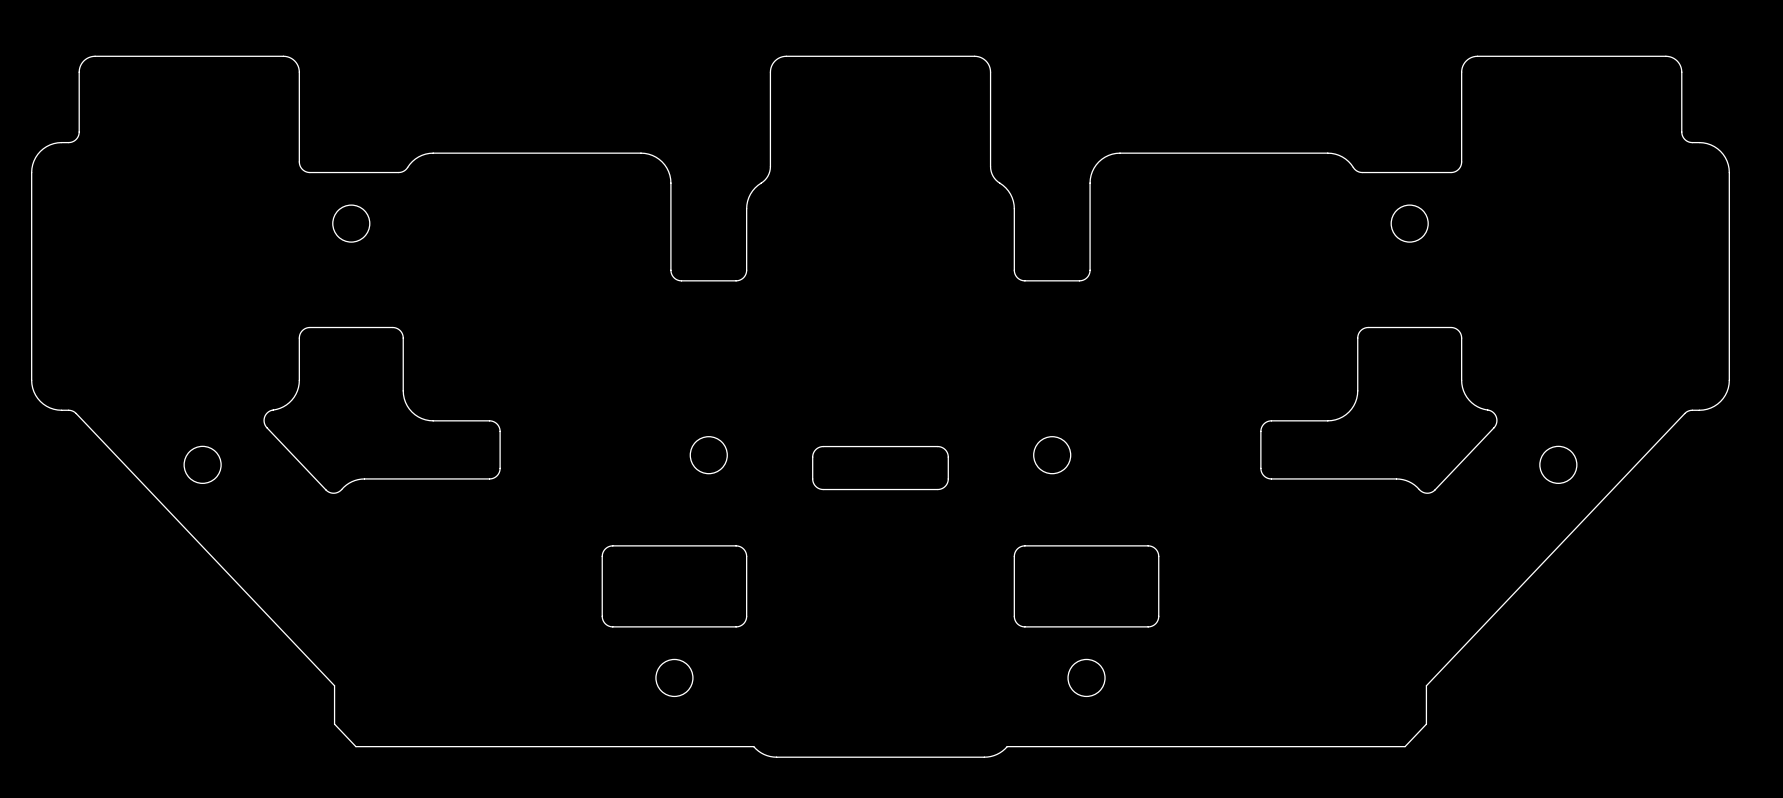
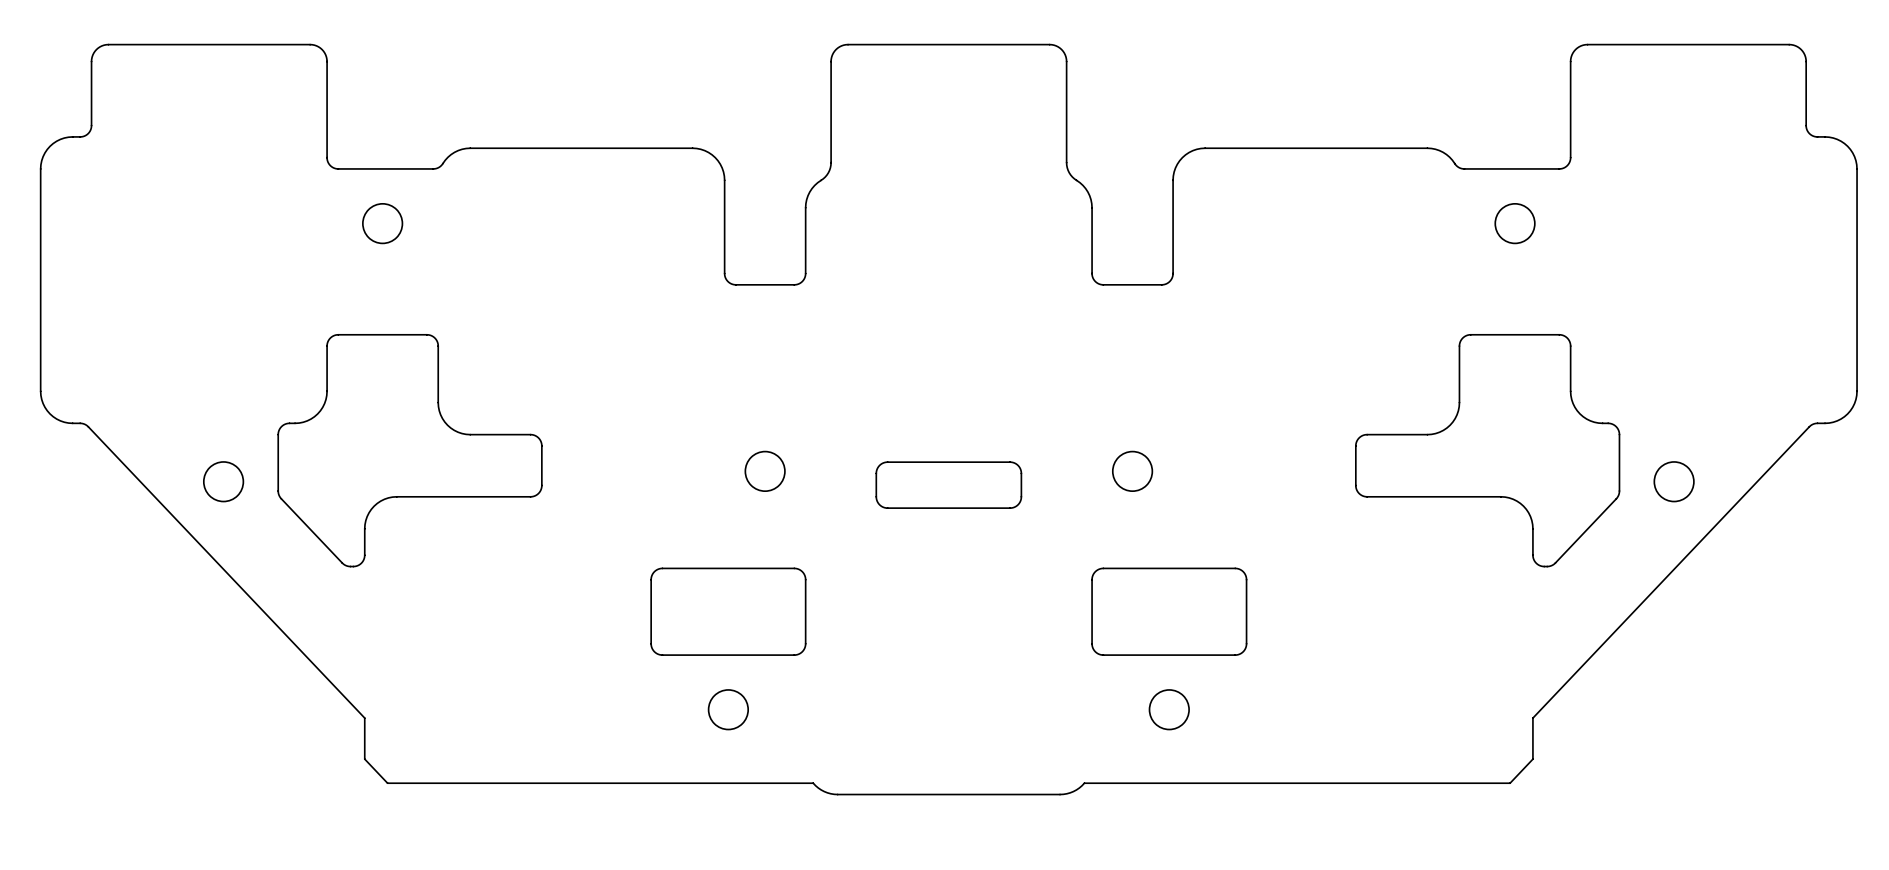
board edge: (299, 380) (297, 390) (291, 400) (283, 406) (270, 410) (265, 414) (264, 420) (266, 426) (329, 492) (337, 492) (351, 481) (364, 478) -> (327, 391) (324, 403) (314, 416) (303, 422) (285, 424) (279, 430) (278, 491) (280, 497) (343, 563) (353, 566) (360, 564) (364, 558) (365, 524) (369, 512) (380, 501) (396, 496)
board edge: (1461, 380) (1463, 390) (1469, 400) (1477, 406) (1490, 410) (1495, 414) (1496, 420) (1494, 426) (1431, 492) (1423, 492) (1409, 481) (1396, 478) -> (1570, 391) (1573, 403) (1583, 416) (1594, 422) (1612, 424) (1618, 430) (1619, 491) (1617, 497) (1554, 563) (1544, 566) (1537, 564) (1533, 558) (1532, 524) (1528, 512) (1516, 501) (1500, 496)

